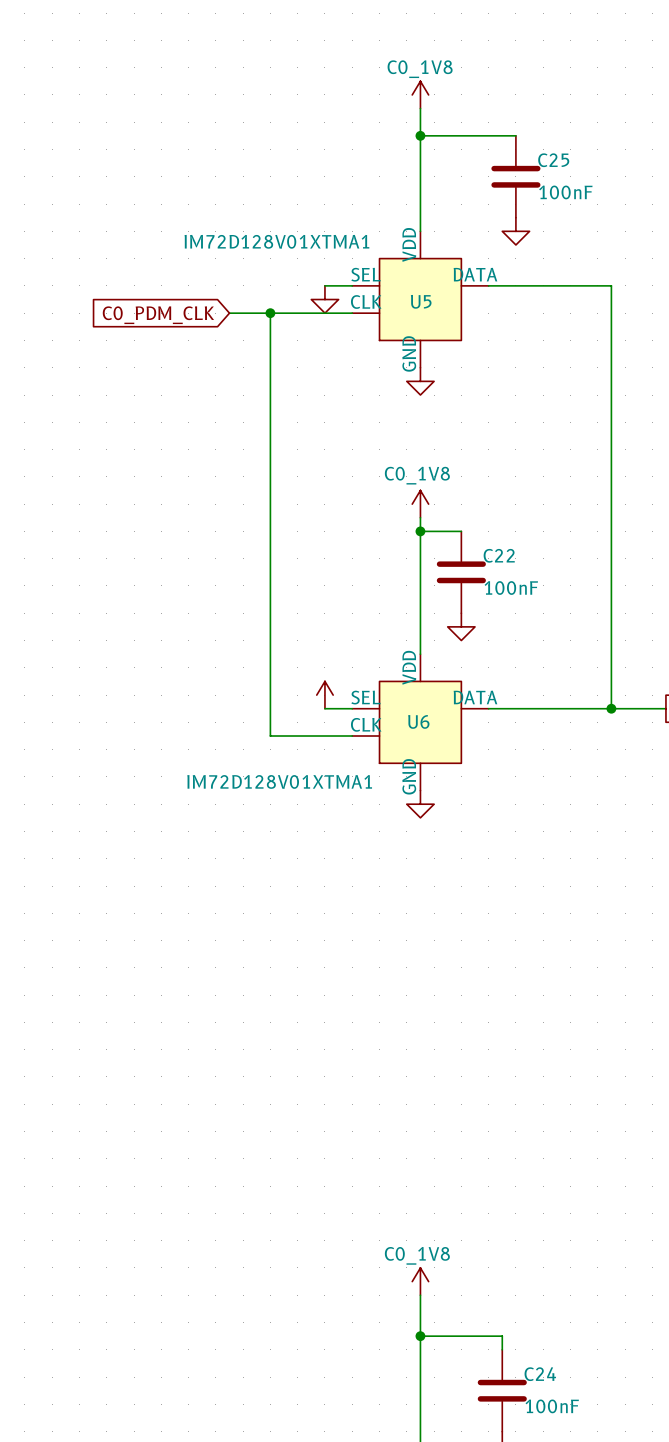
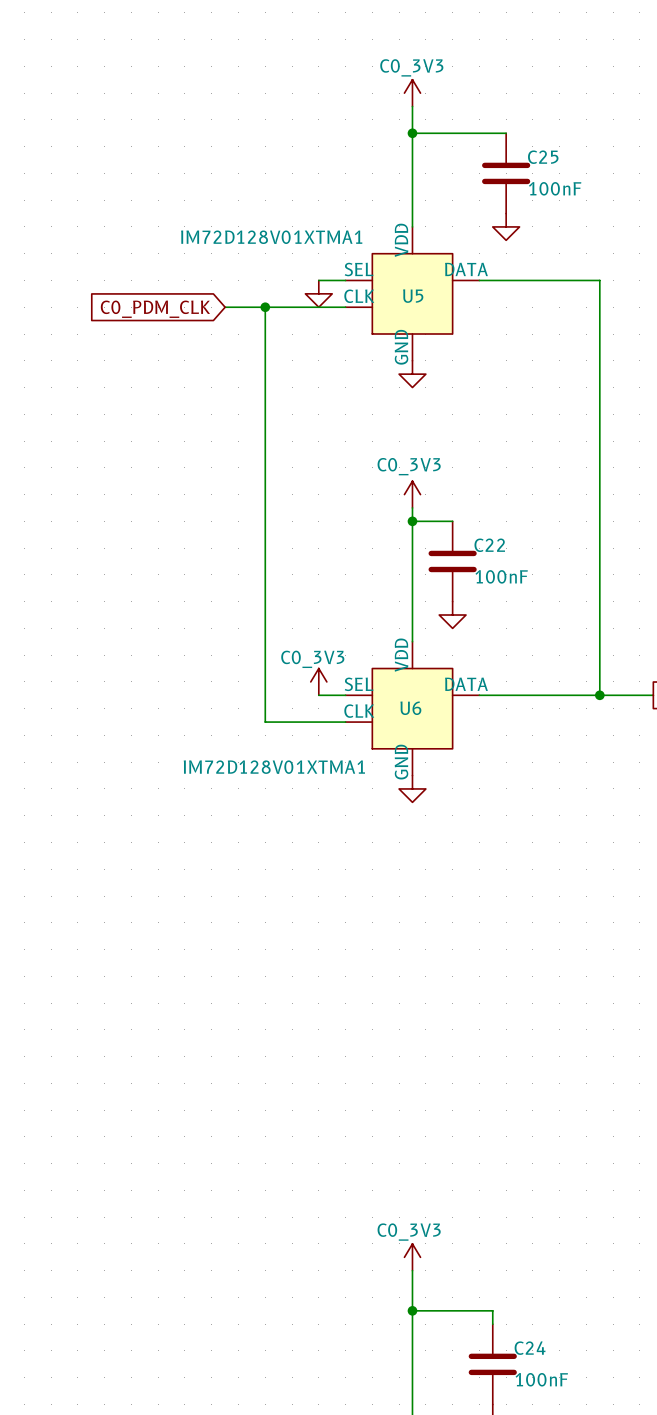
power symbol: C0_1V8 (420, 94) -> C0_3V3 (412, 93)
power symbol: C0_1V8 (420, 504) -> C0_3V3 (412, 494)
power symbol text: none -> C0_3V3 (312, 659)
power symbol: C0_1V8 (420, 1281) -> C0_3V3 (412, 1257)

